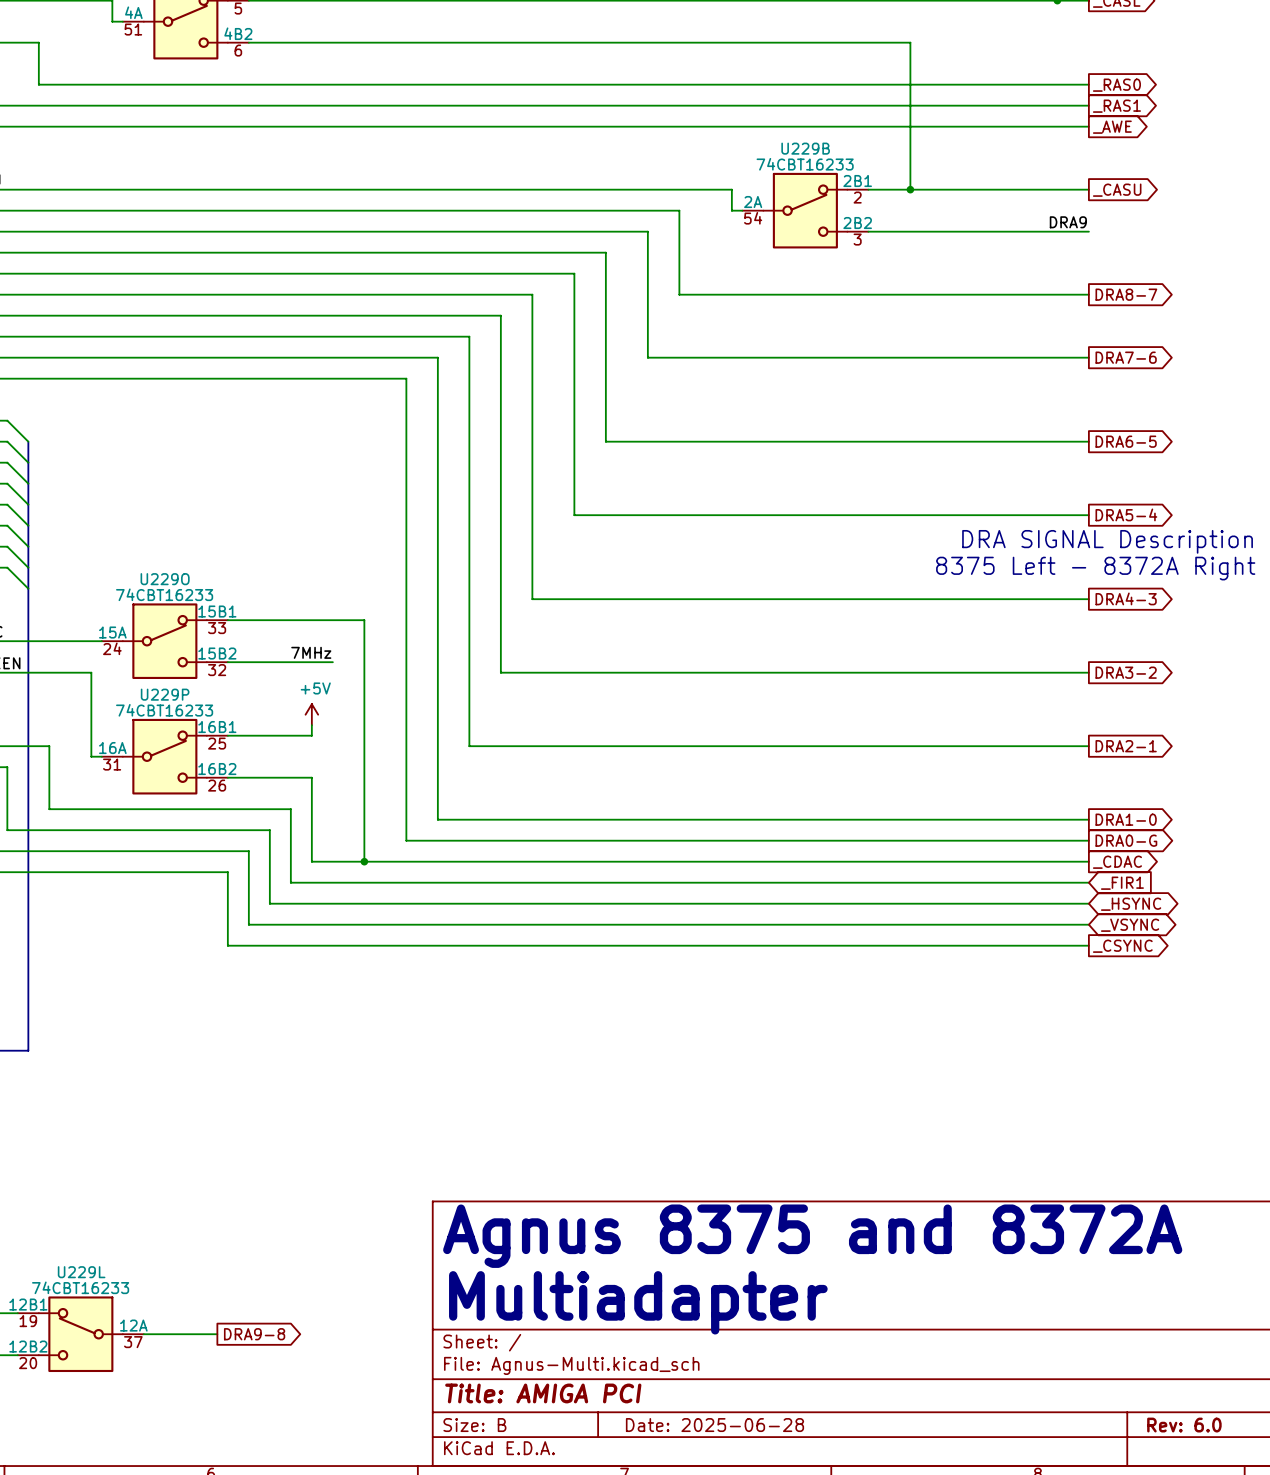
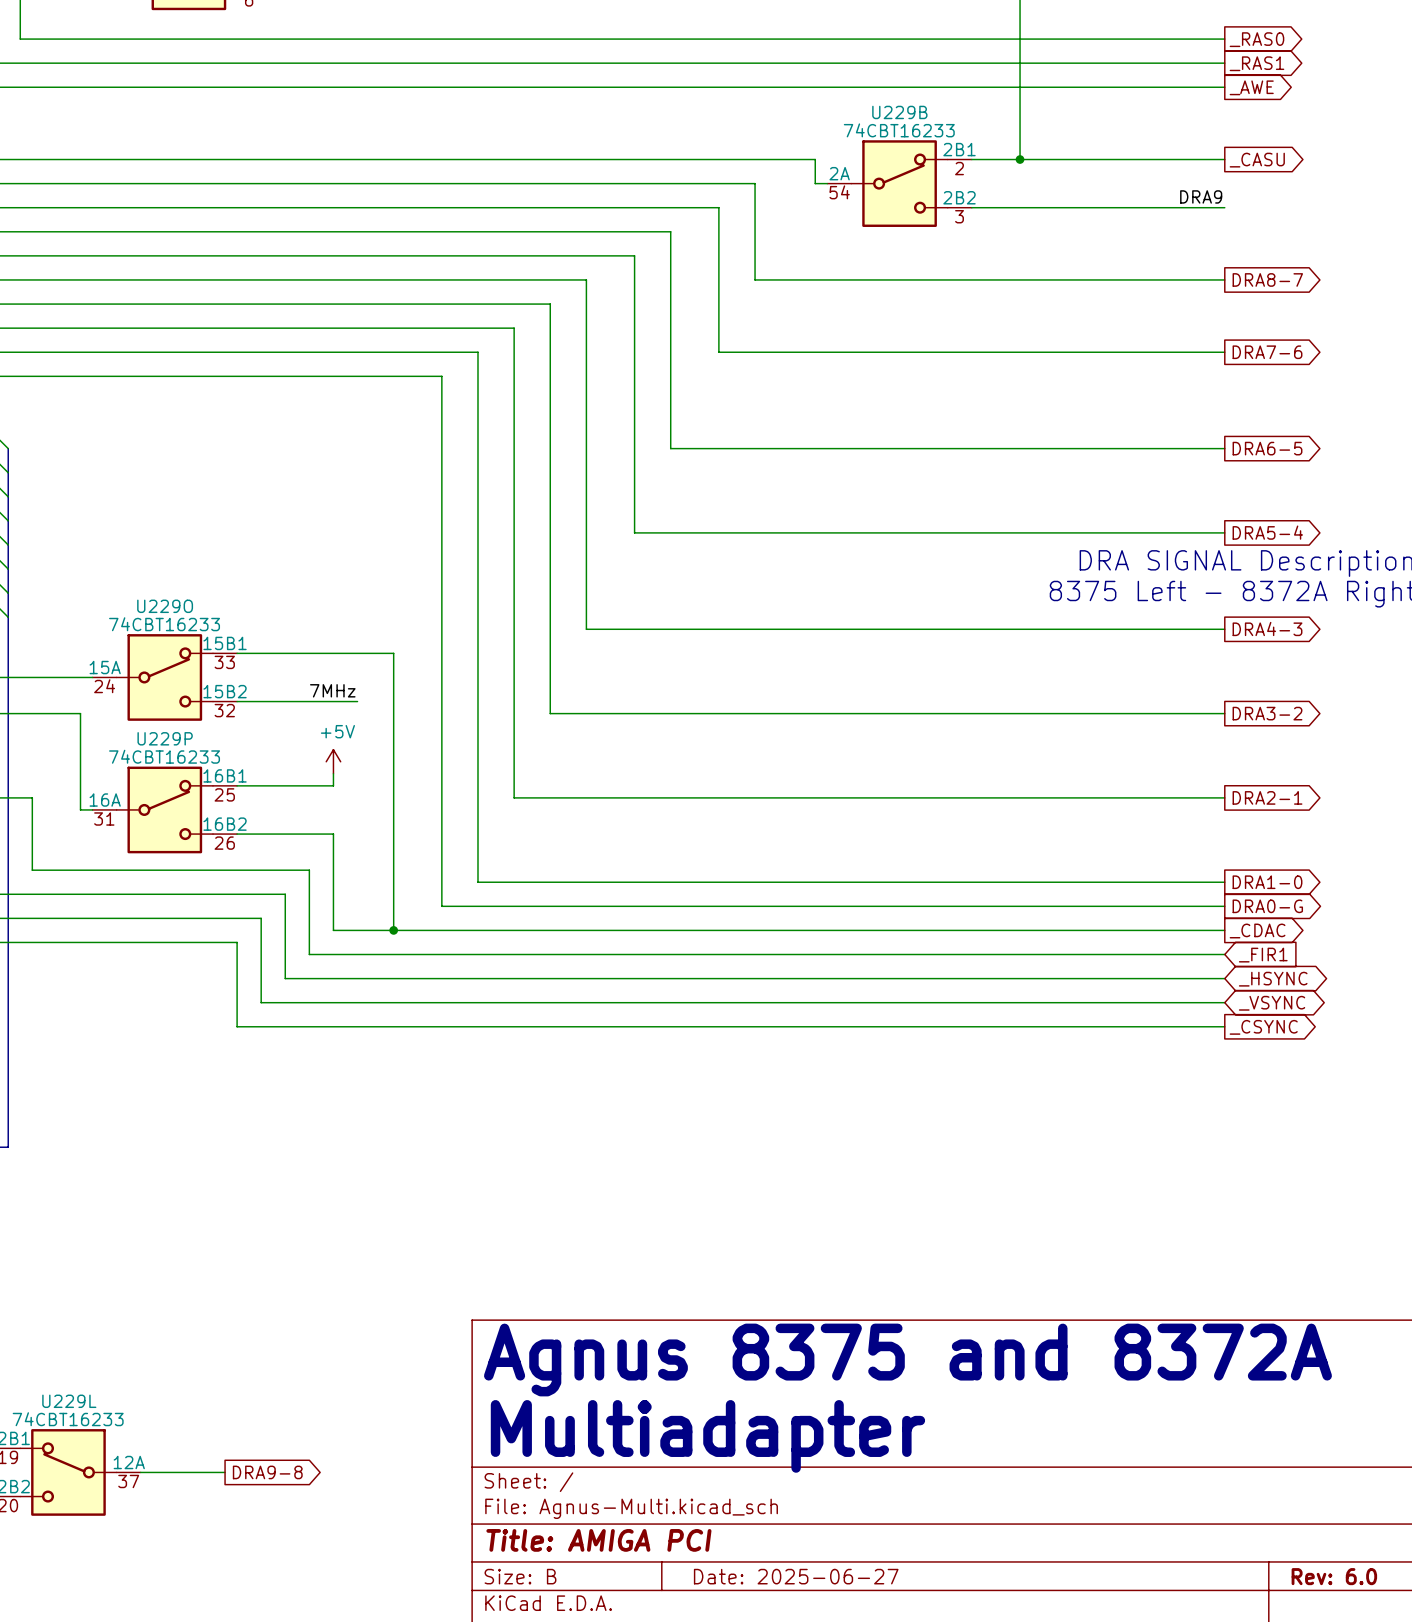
title block: Date: 2025-06-28 (714, 1425) -> Date: 2025-06-27 (796, 1576)

